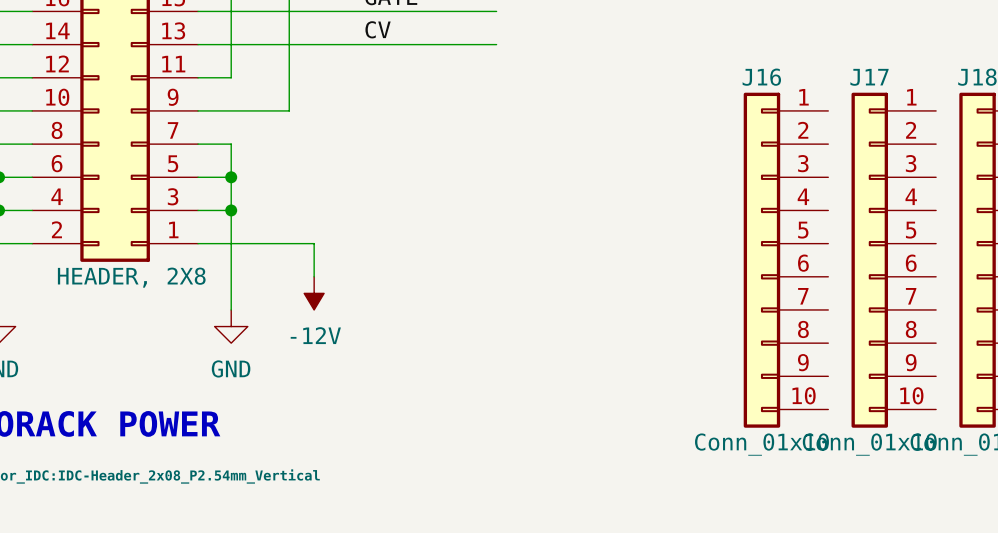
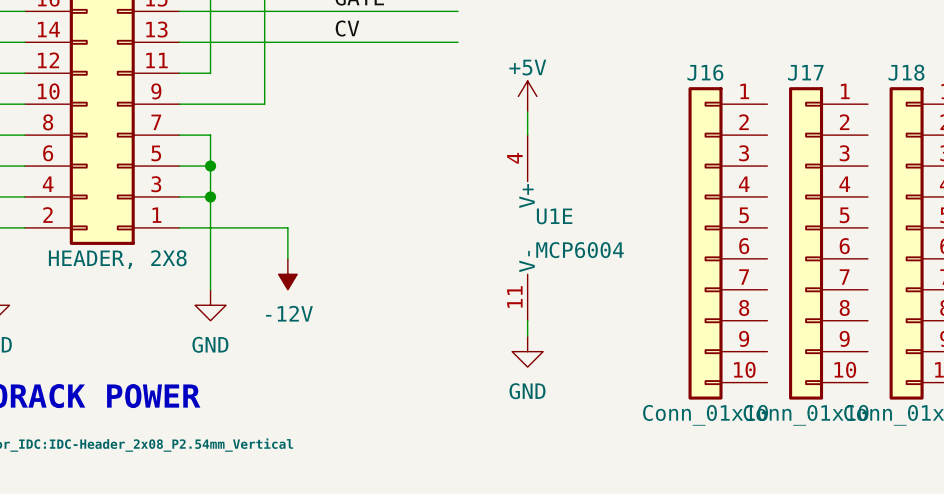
power symbol: none -> +5V (527, 96)
wire: none -> (527, 111) (527, 135)
U1E: none -> MCP6004 (527, 227)
wire: none -> (527, 320) (527, 336)
power symbol: none -> GND (527, 351)

